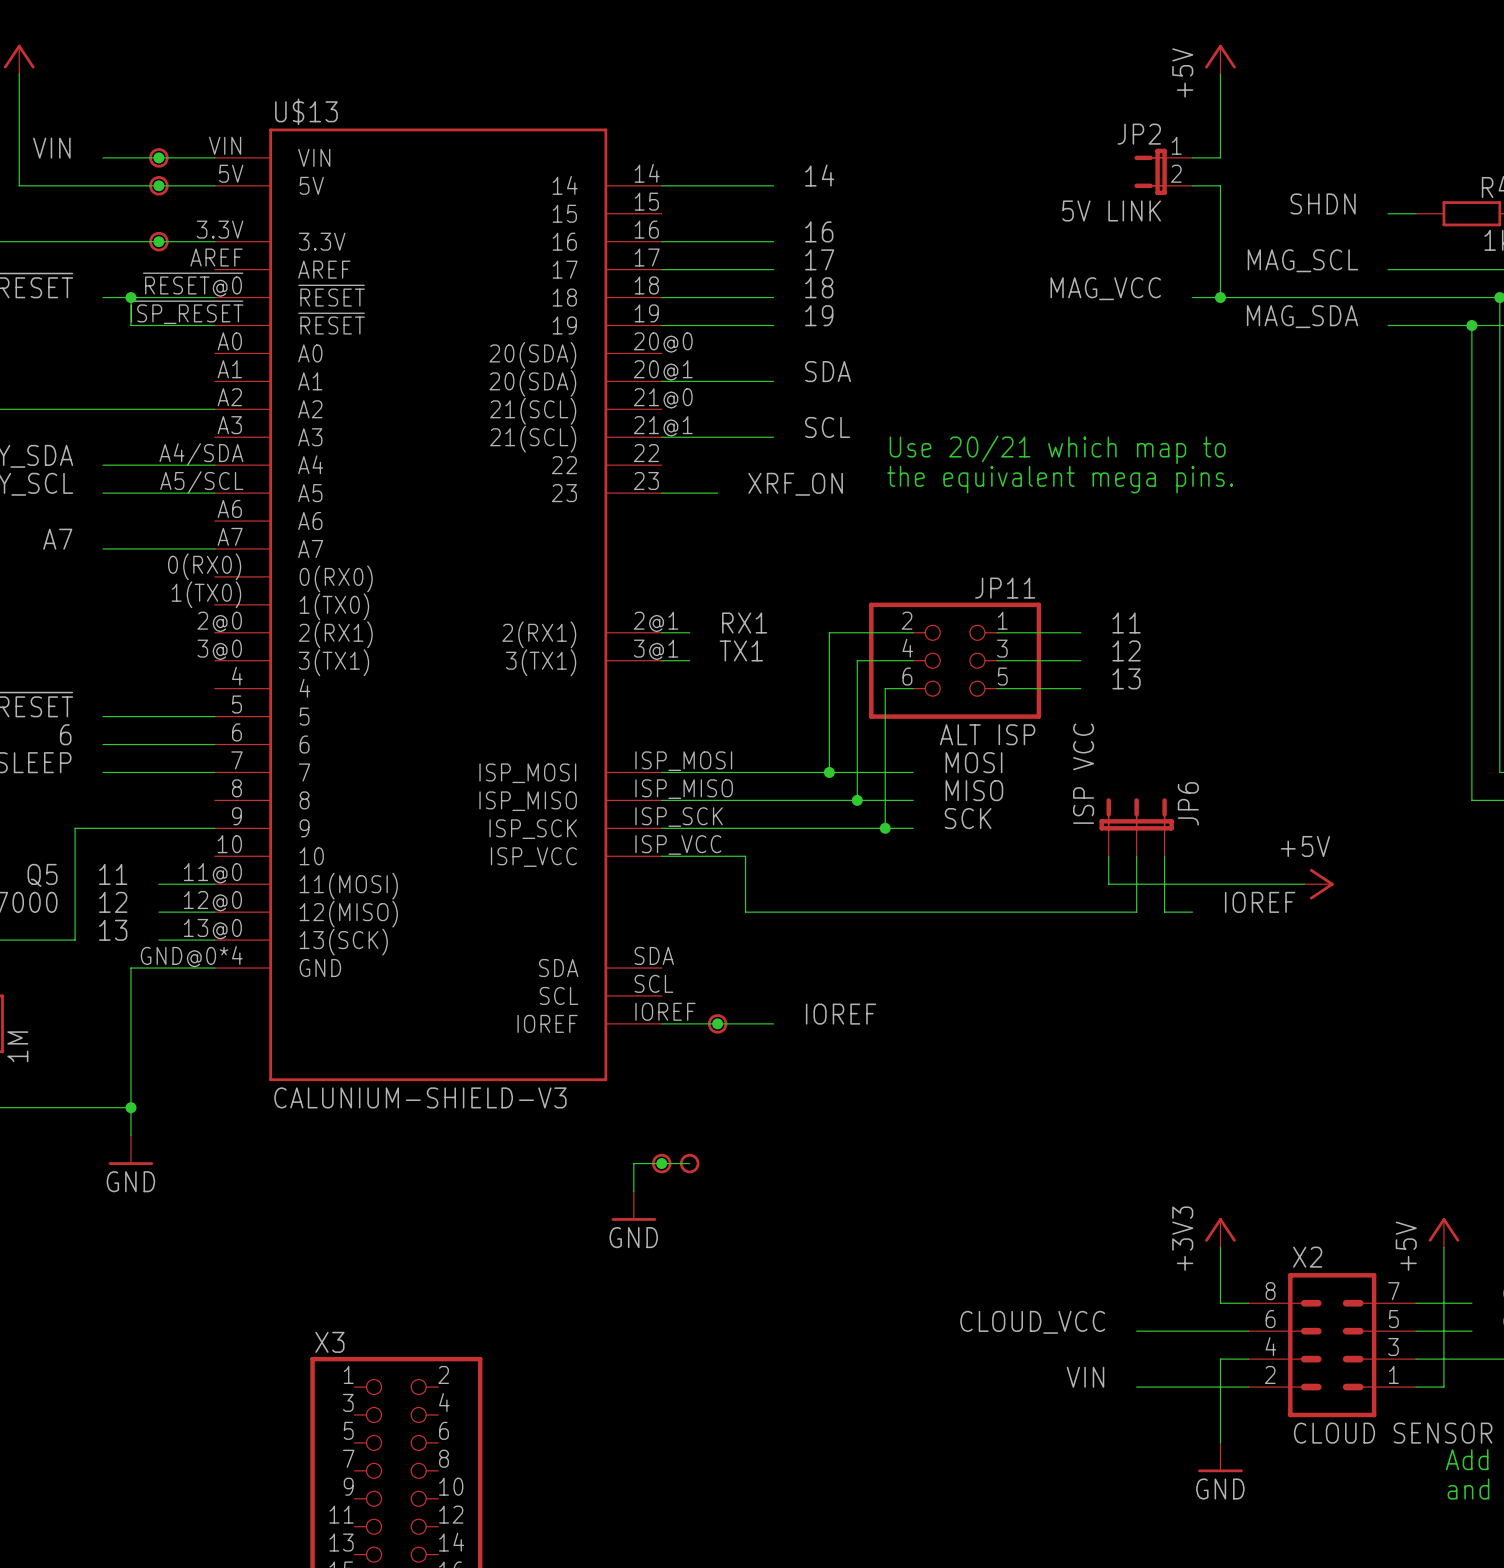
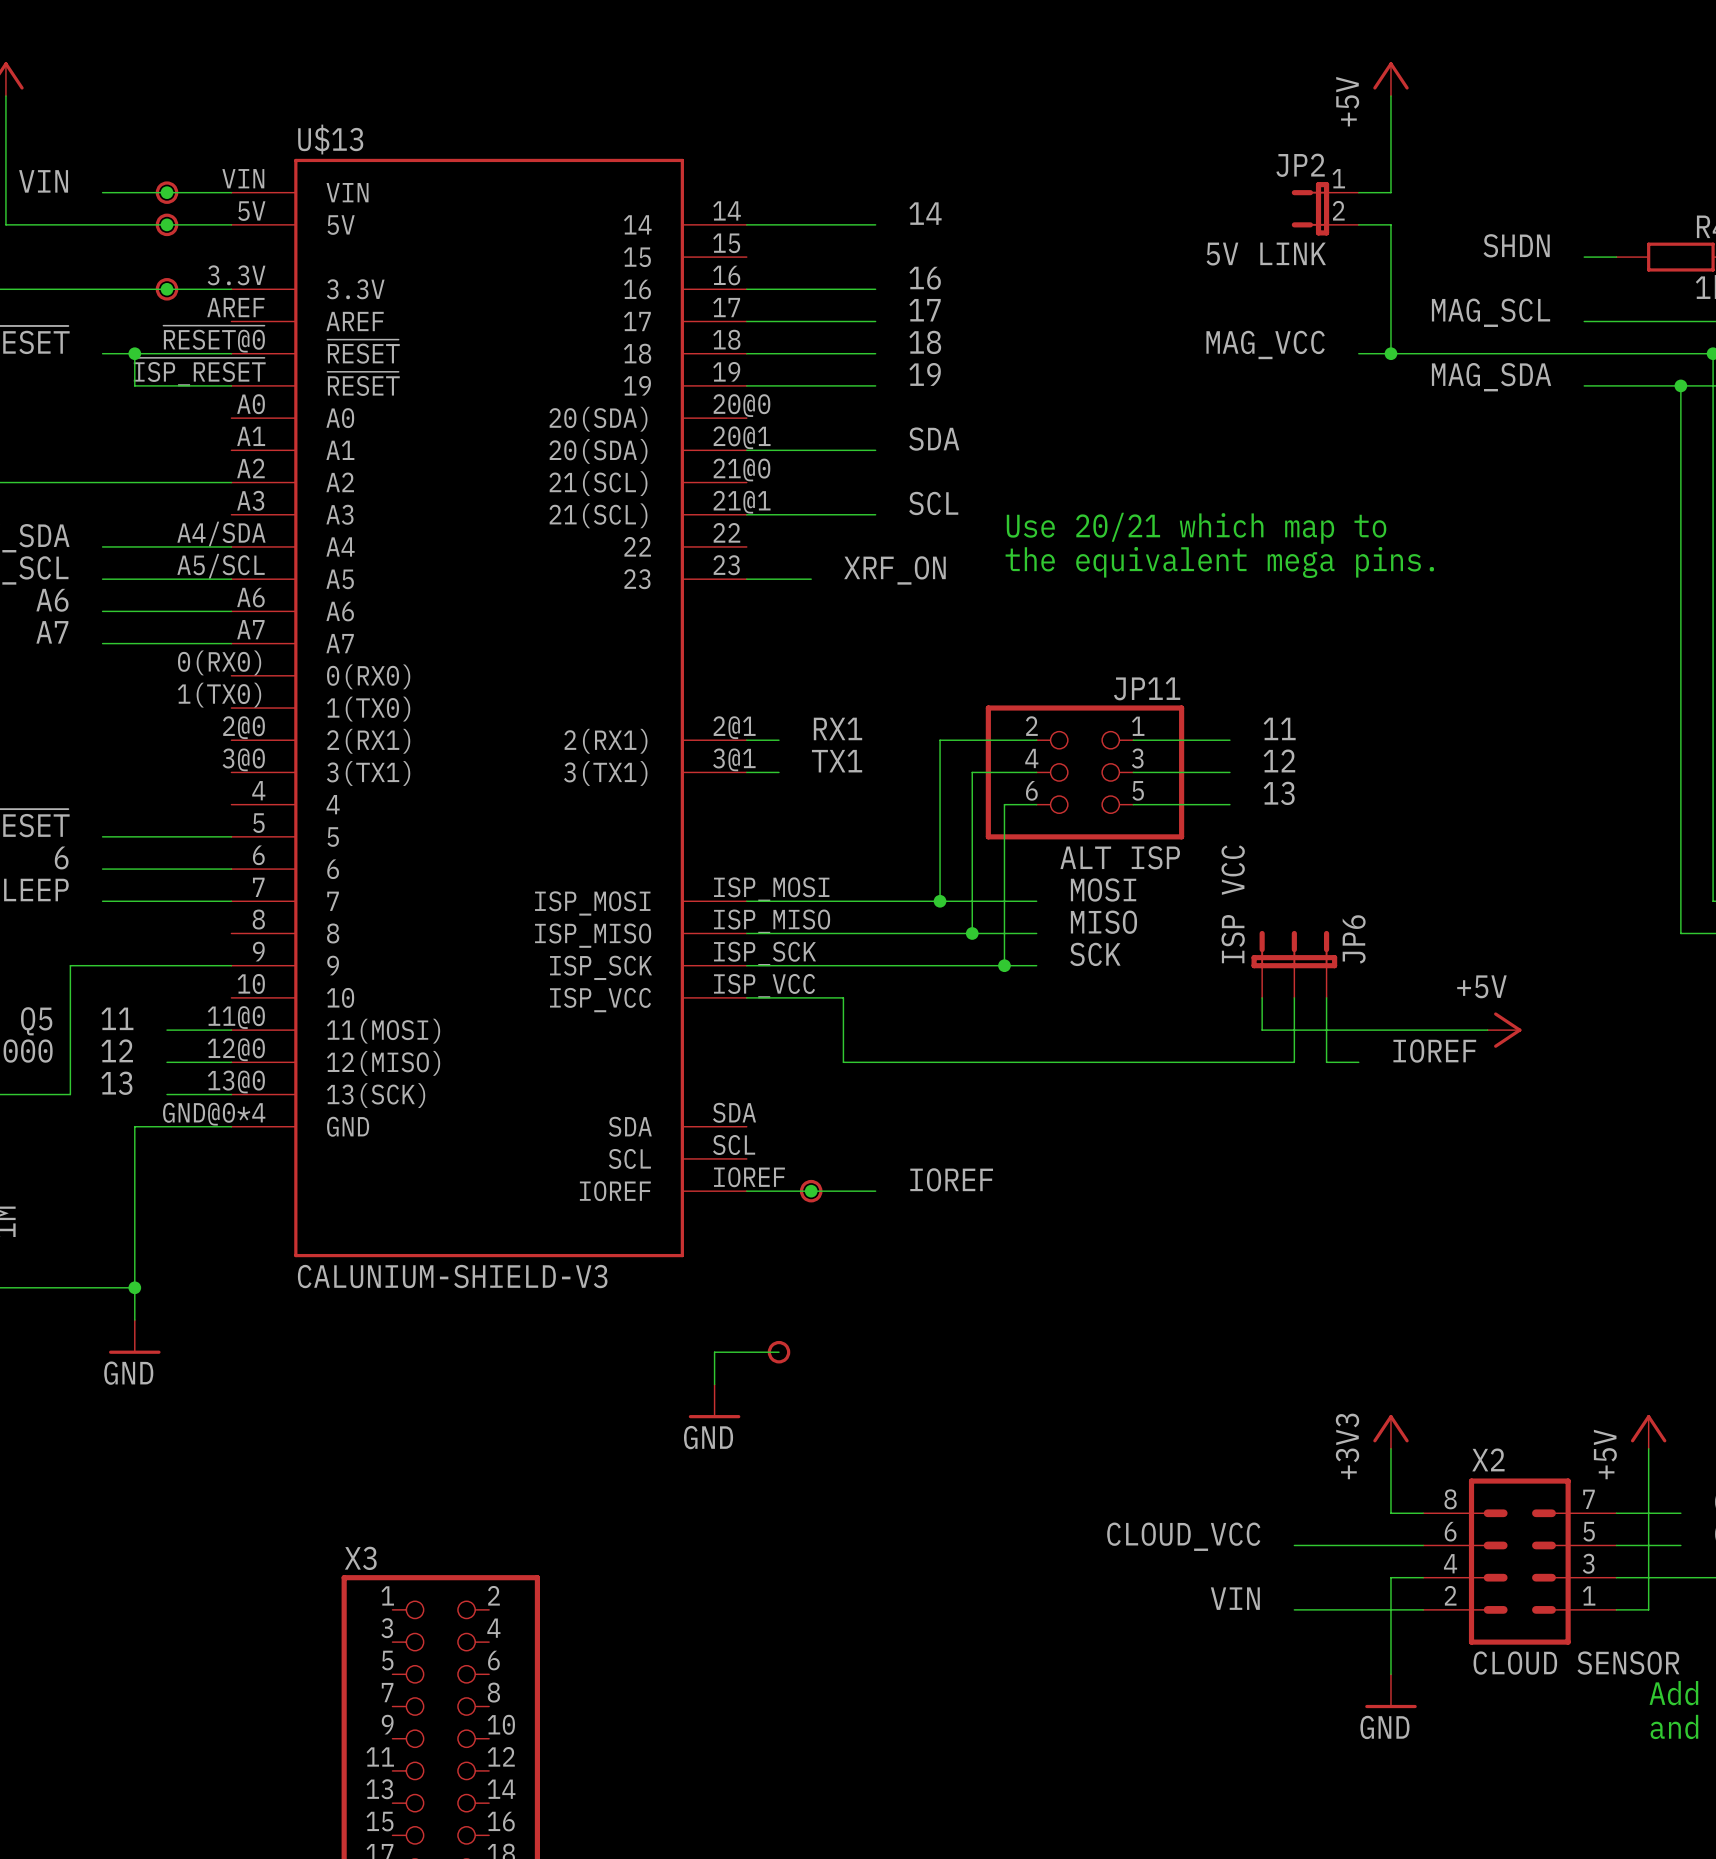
label: none -> A6 (52, 600)
wire: none -> (102, 611) (231, 611)
part: (661, 1163) -> none
junction: (661, 1163) -> none

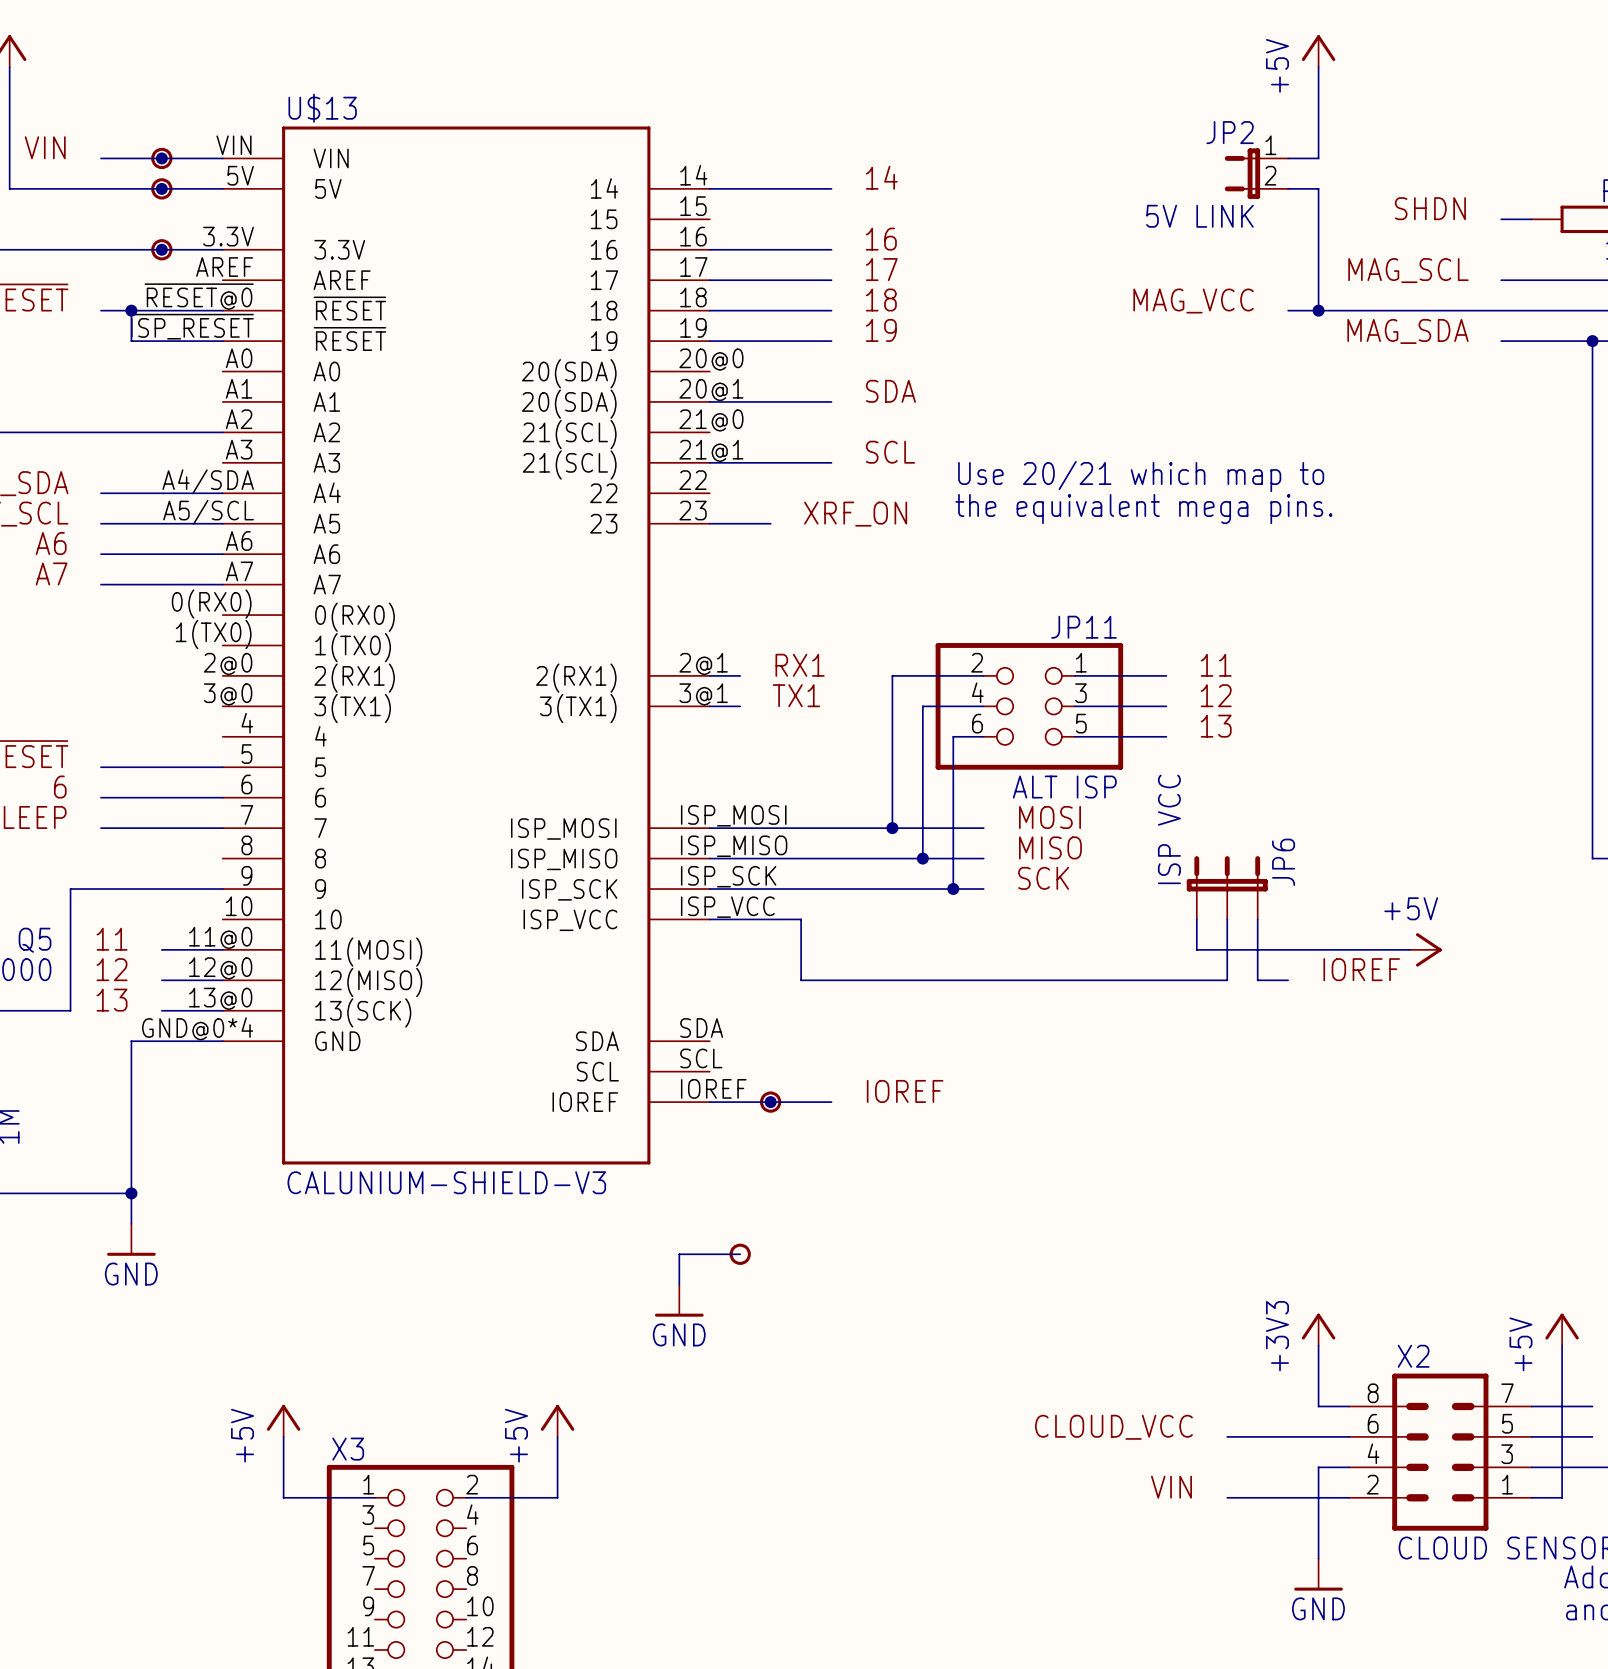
power symbol: none -> +5V (283, 1420)
power symbol: none -> +5V (557, 1420)
wire: none -> (283, 1436) (283, 1497) (374, 1497)
wire: none -> (557, 1436) (557, 1497) (466, 1497)

